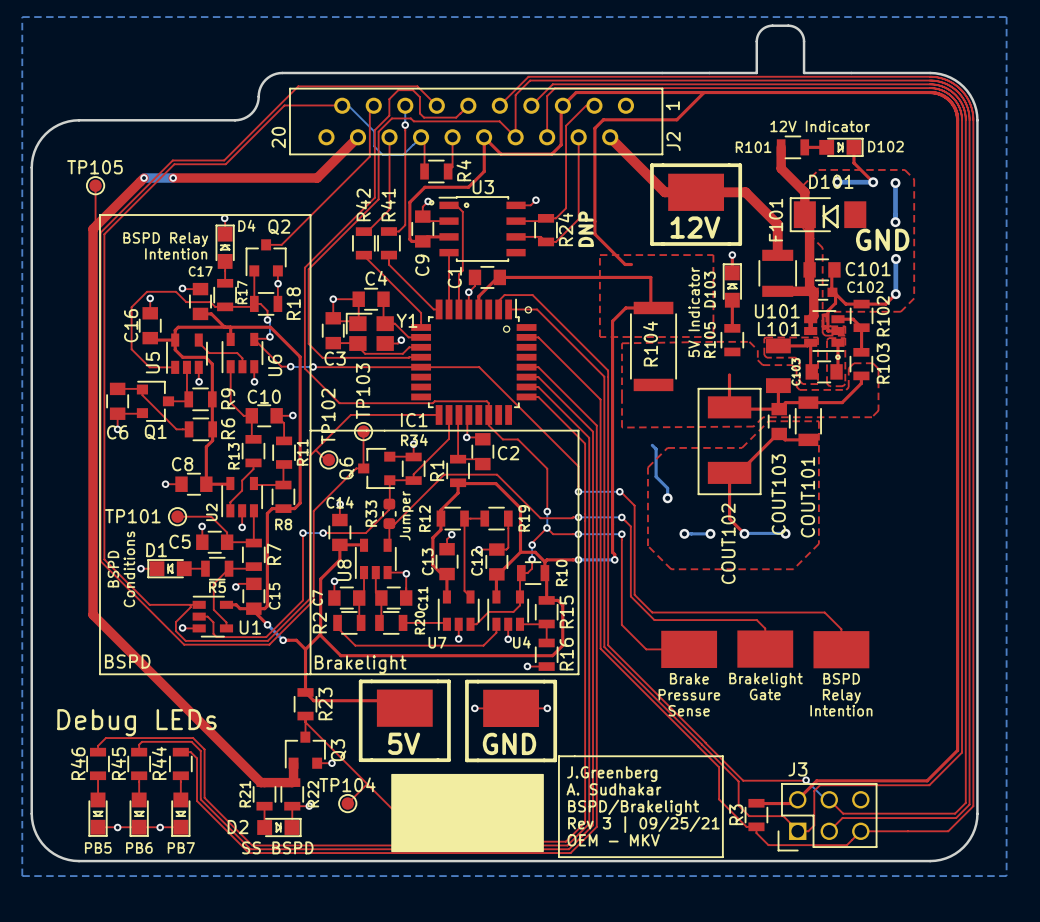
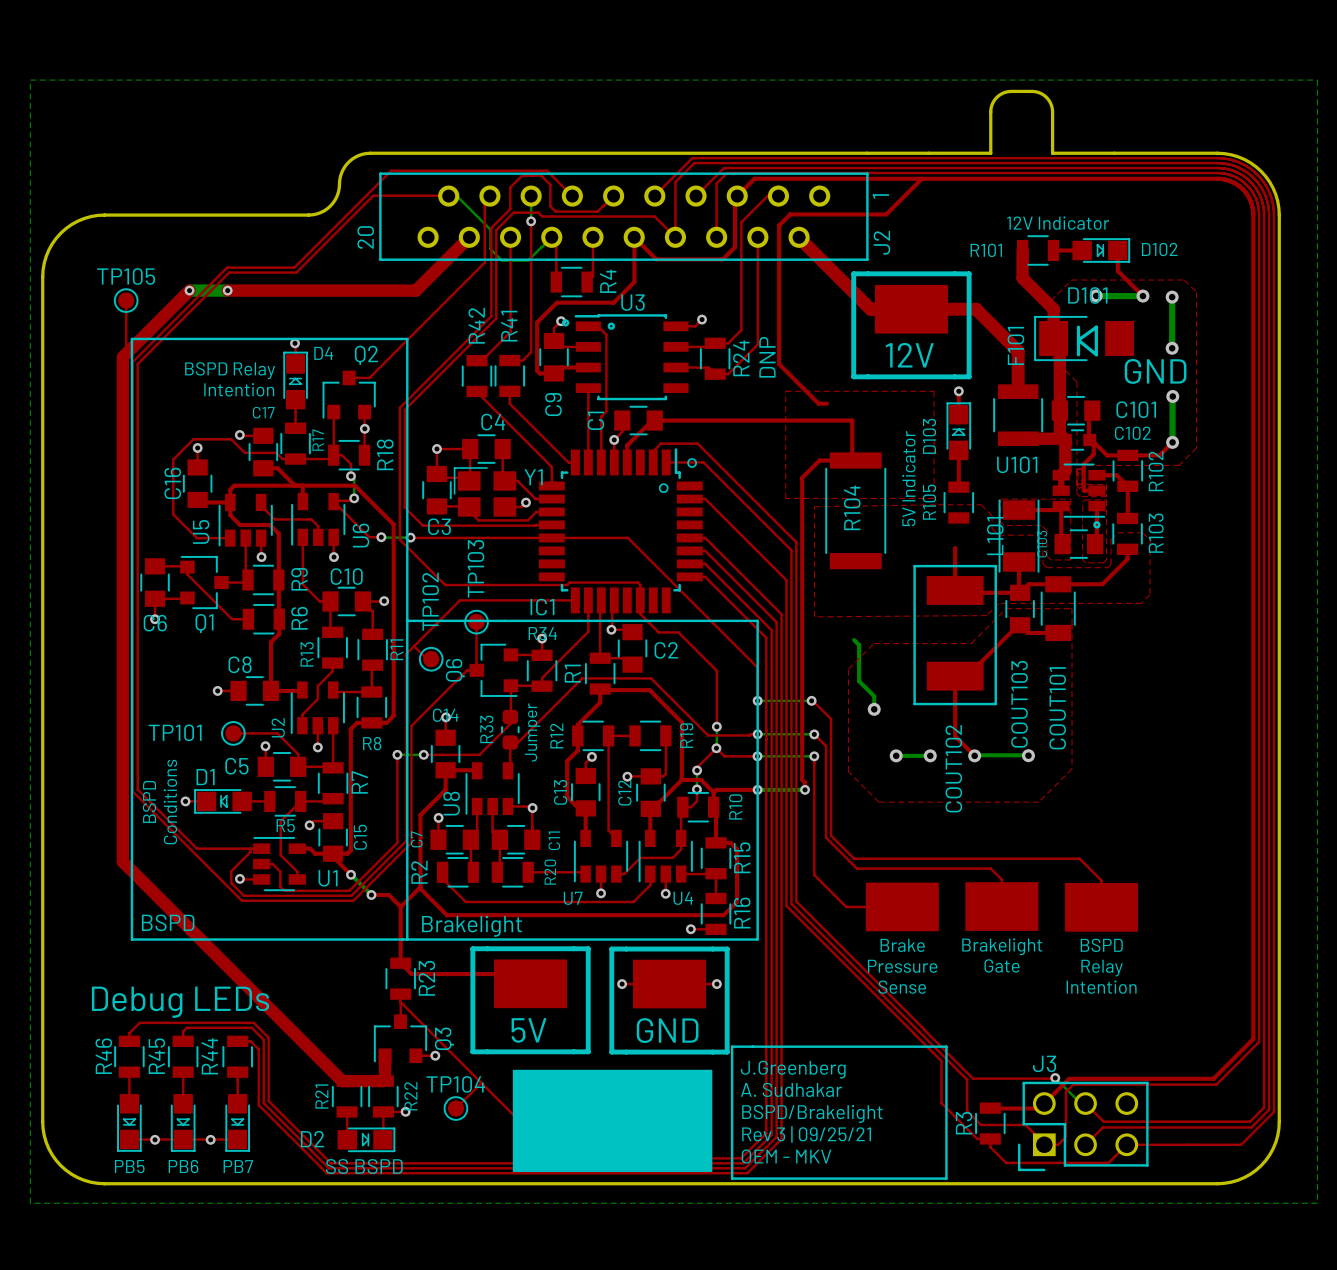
L101 name position: L101 (778, 328) -> L101 (995, 536)
L101 footprint: [765, 338, 791, 394] -> [998, 499, 1040, 573]

